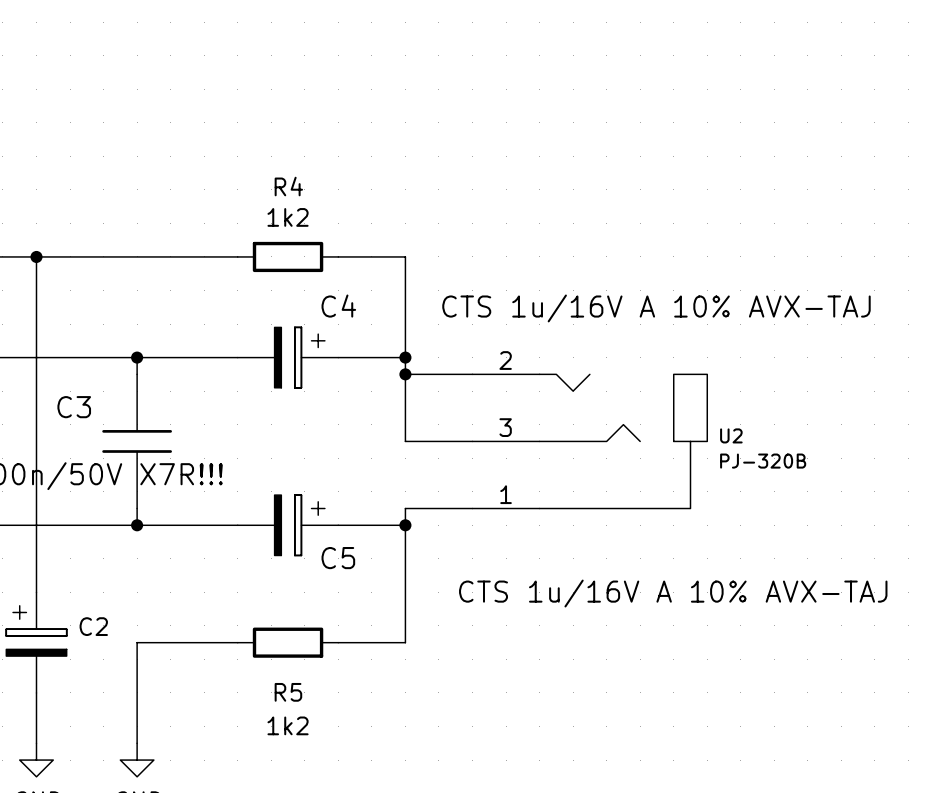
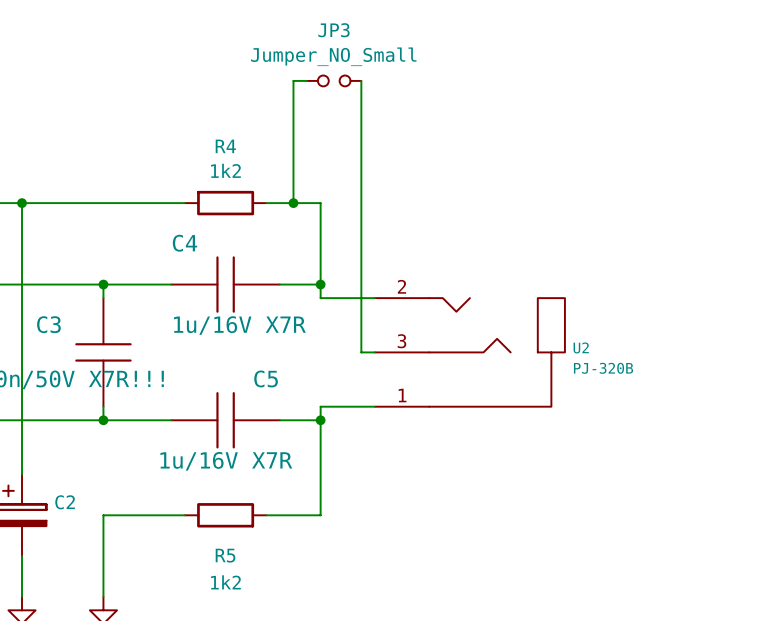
wire: none -> (307, 80) (293, 80) (293, 203)
JP3: none -> Jumper_NO_Small (334, 80)
junction: none -> (293, 203)
C4 name position: C4 (338, 306) -> C4 (184, 243)
C4 value: CTS 1u/16V A 10% AVX-TAJ (656, 308) -> 1u/16V X7R (239, 325)
C4 symbol: [237, 327, 339, 388] -> [171, 256, 280, 313]
wire: (405, 374) (405, 441) (455, 441) -> (361, 80) (361, 352)
junction: (405, 374) -> none
C5 symbol: [237, 495, 339, 556] -> [171, 392, 280, 449]
C5 name position: C5 (338, 558) -> C5 (266, 378)
C5 value: CTS 1u/16V A 10% AVX-TAJ (673, 593) -> 1u/16V X7R (226, 461)

